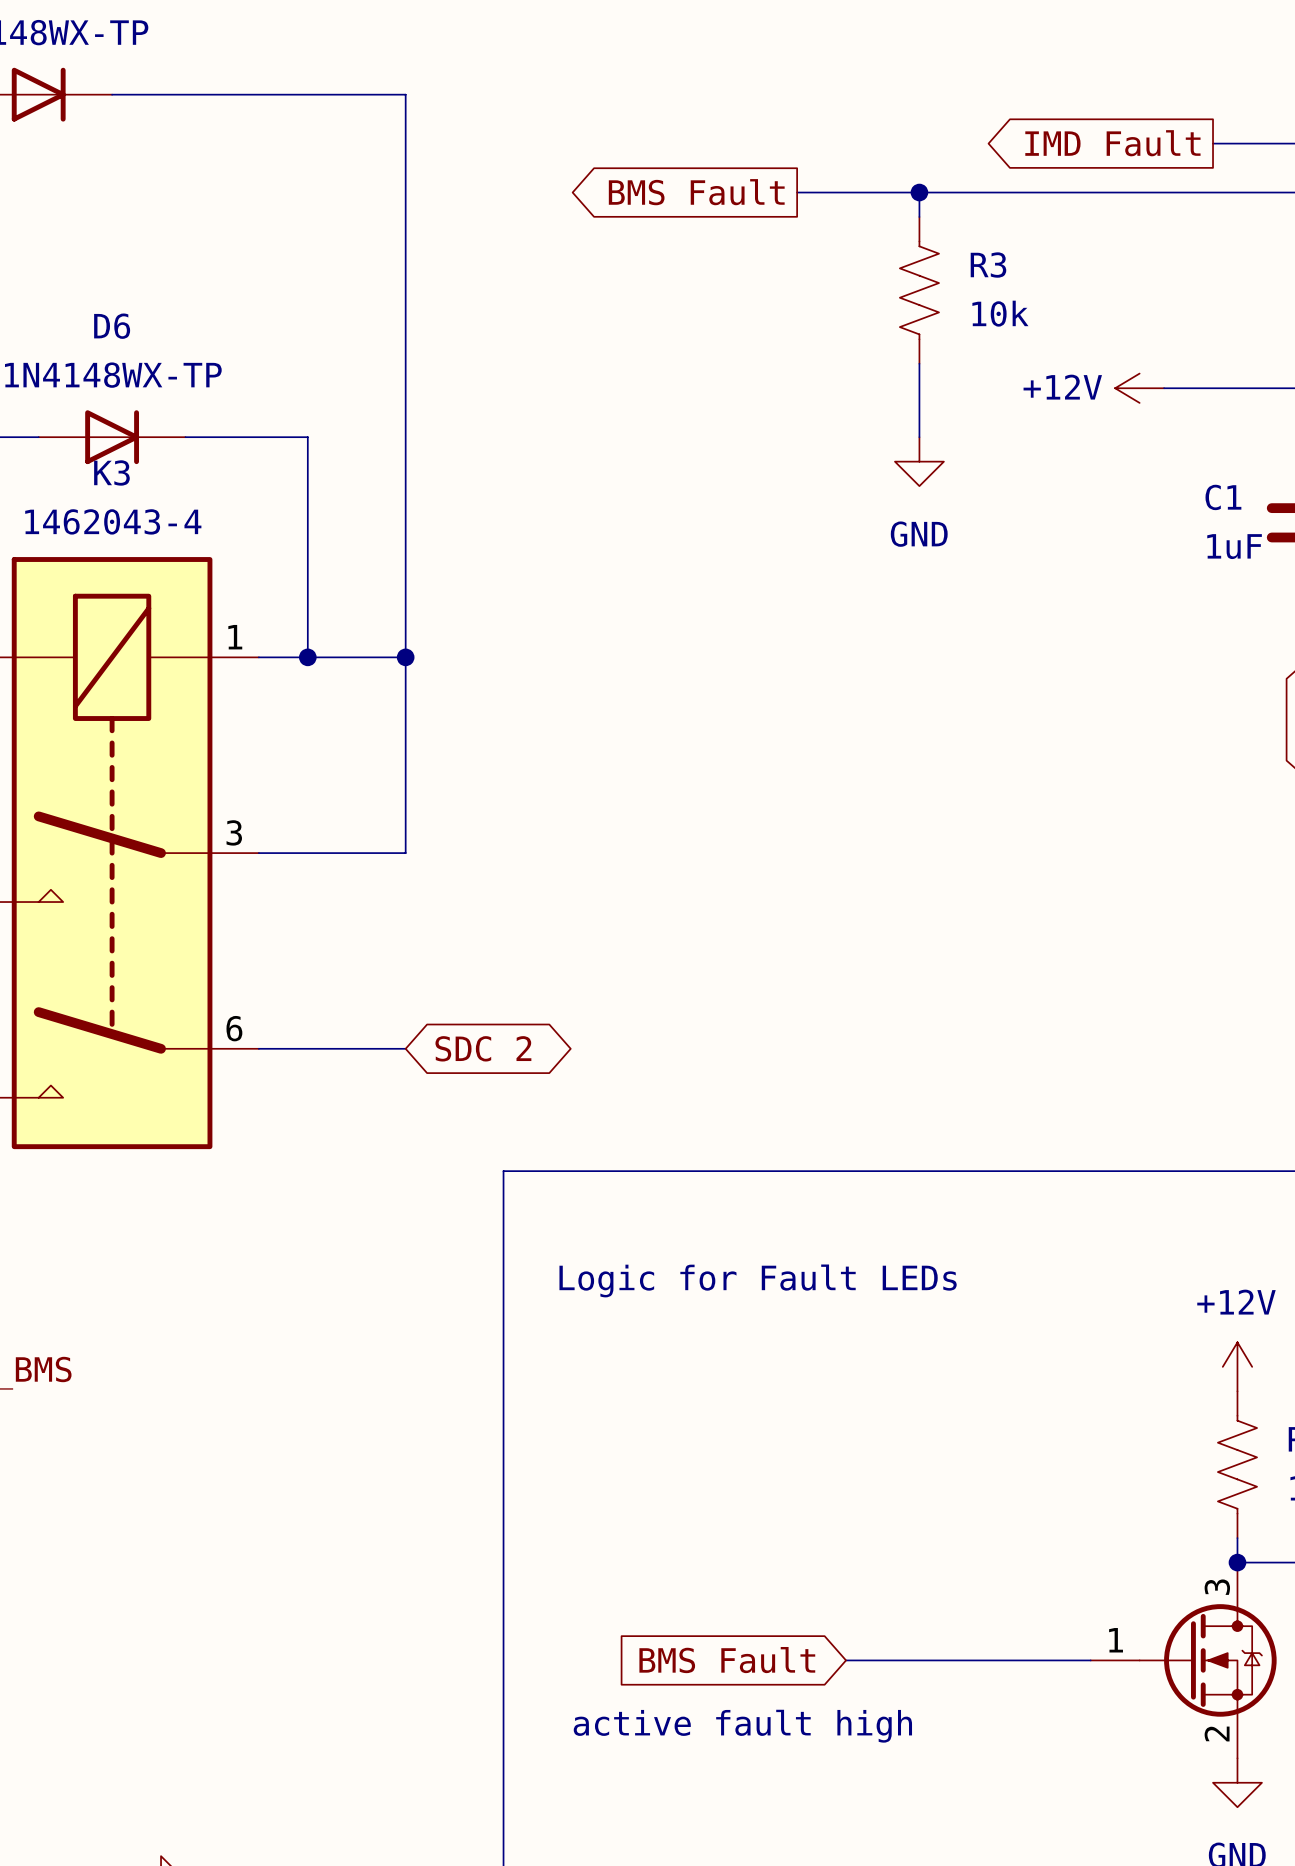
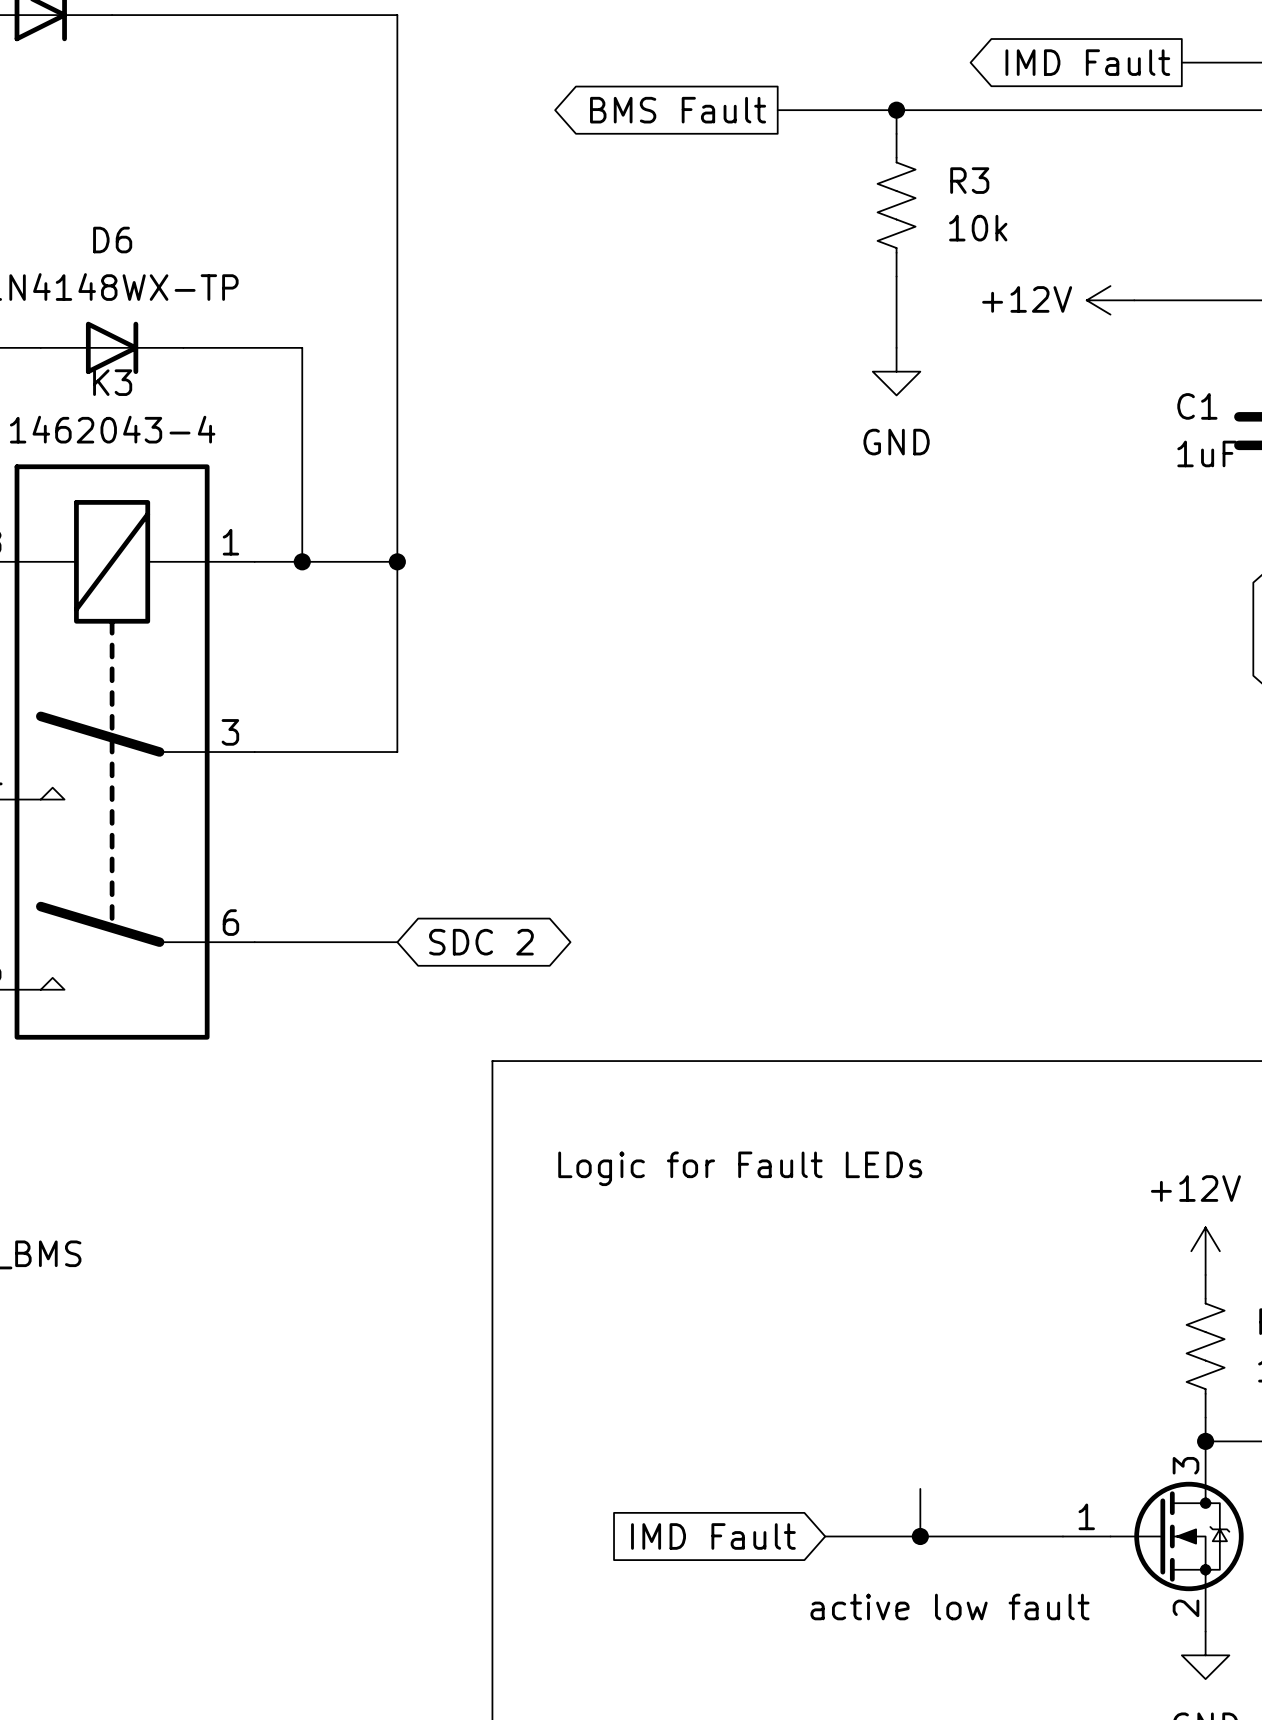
wire: none -> (920, 1488) (920, 1536)
global label: BMS Fault (727, 1660) -> IMD Fault (713, 1536)
junction: none -> (920, 1536)
text: active fault high (742, 1726) -> active low fault (950, 1606)

